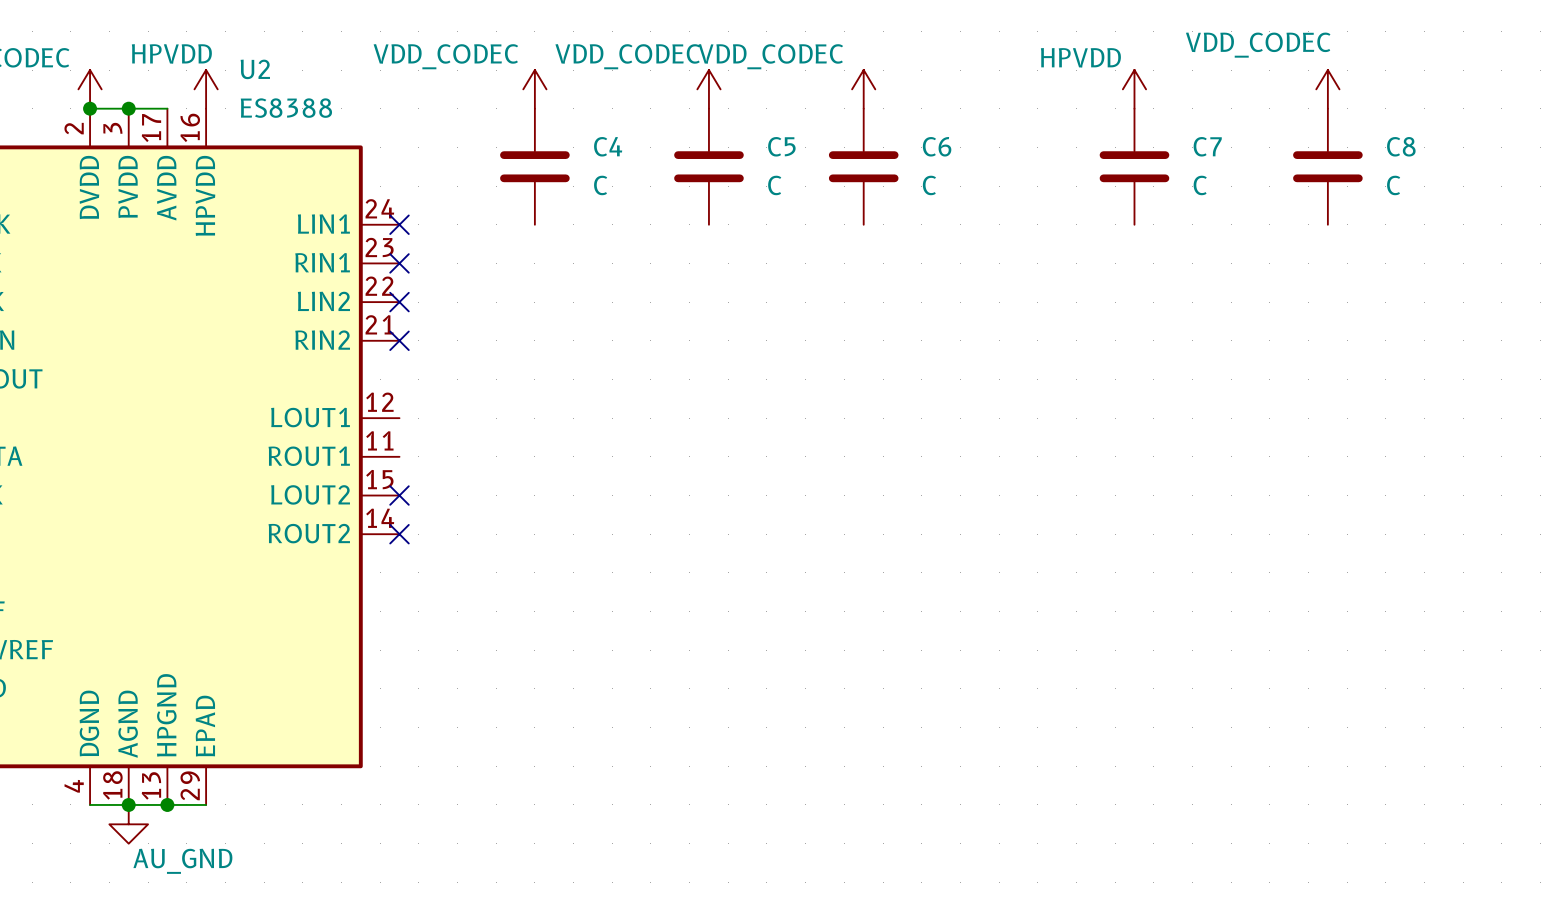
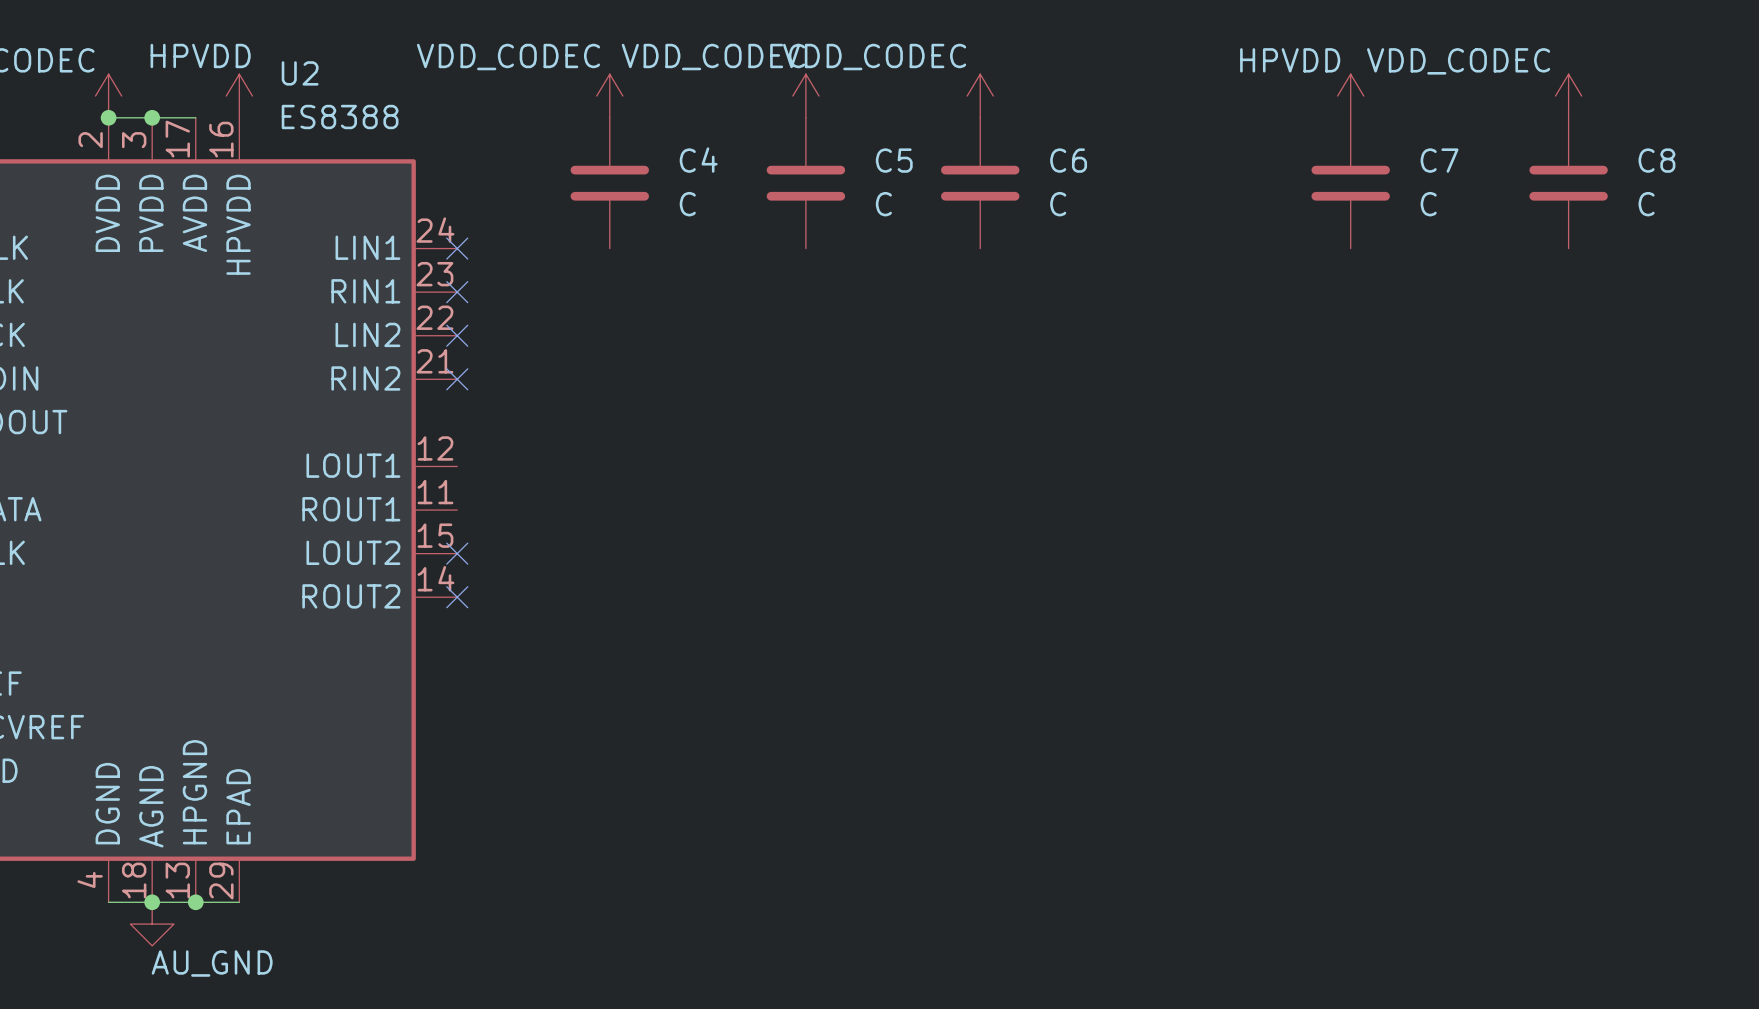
power symbol text position: VDD_CODEC (1258, 45) -> VDD_CODEC (1458, 61)
power symbol position: HPVDD (1134, 89) -> HPVDD (1350, 96)
power symbol position: VDD_CODEC (1327, 89) -> VDD_CODEC (1568, 96)
C7 position: (1134, 166) -> (1350, 183)
C8 position: (1327, 166) -> (1568, 183)

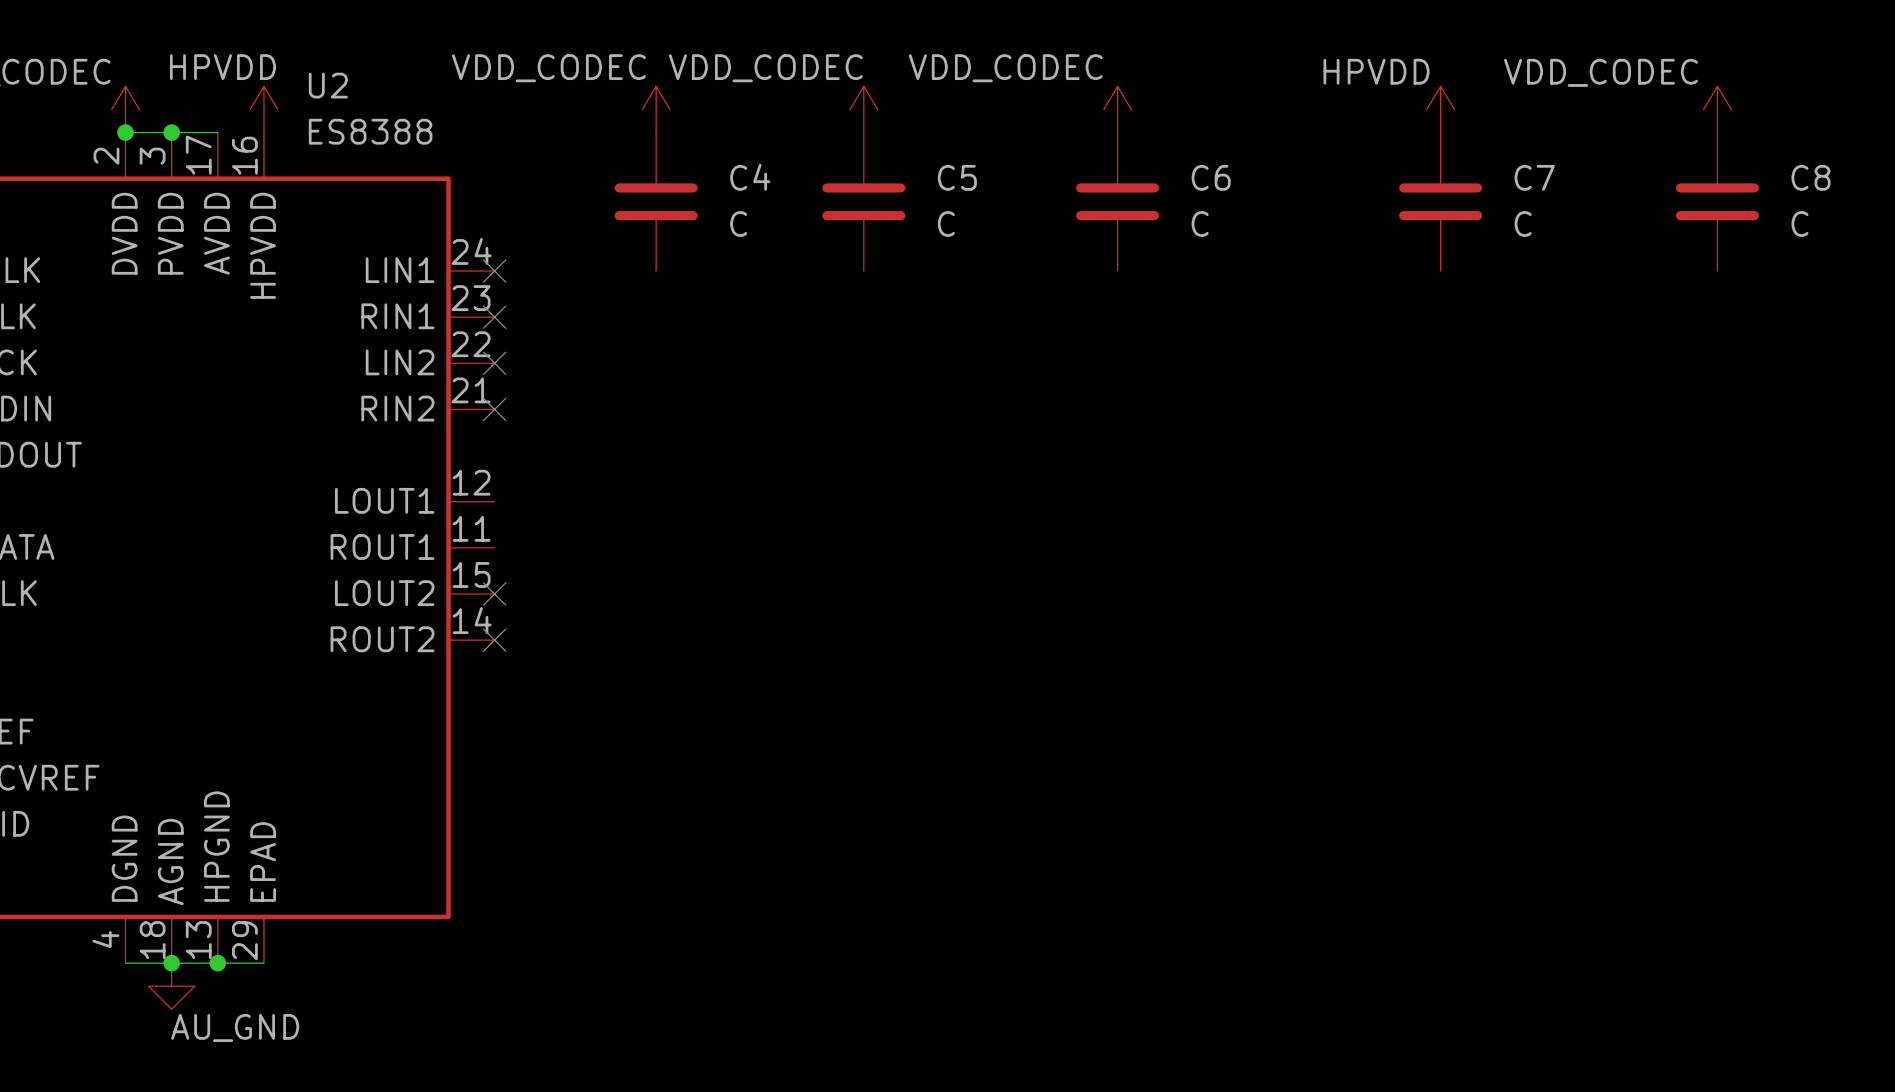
power symbol position: VDD_CODEC (980, 96) -> VDD_CODEC (1117, 109)
power symbol position: VDD_CODEC (1568, 96) -> VDD_CODEC (1717, 109)
C6 position: (980, 183) -> (1117, 201)
C8 position: (1568, 183) -> (1717, 201)

